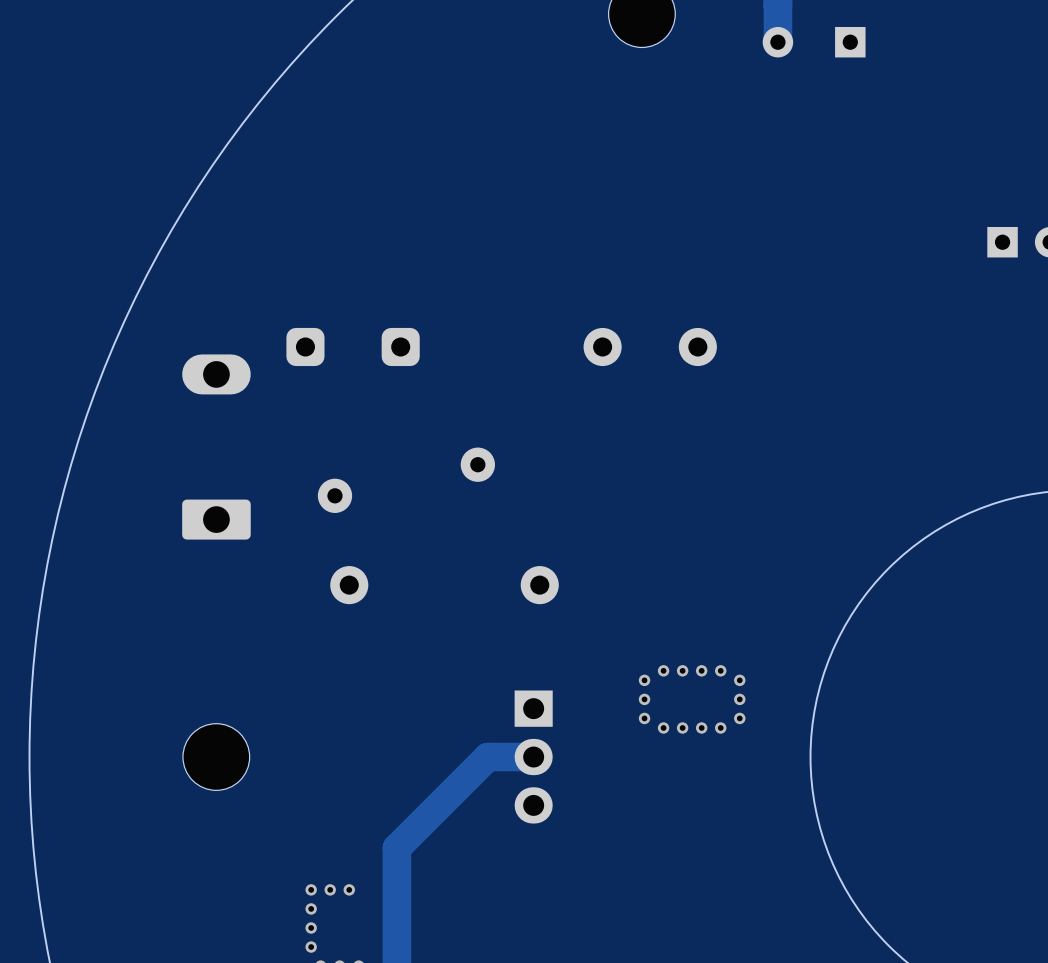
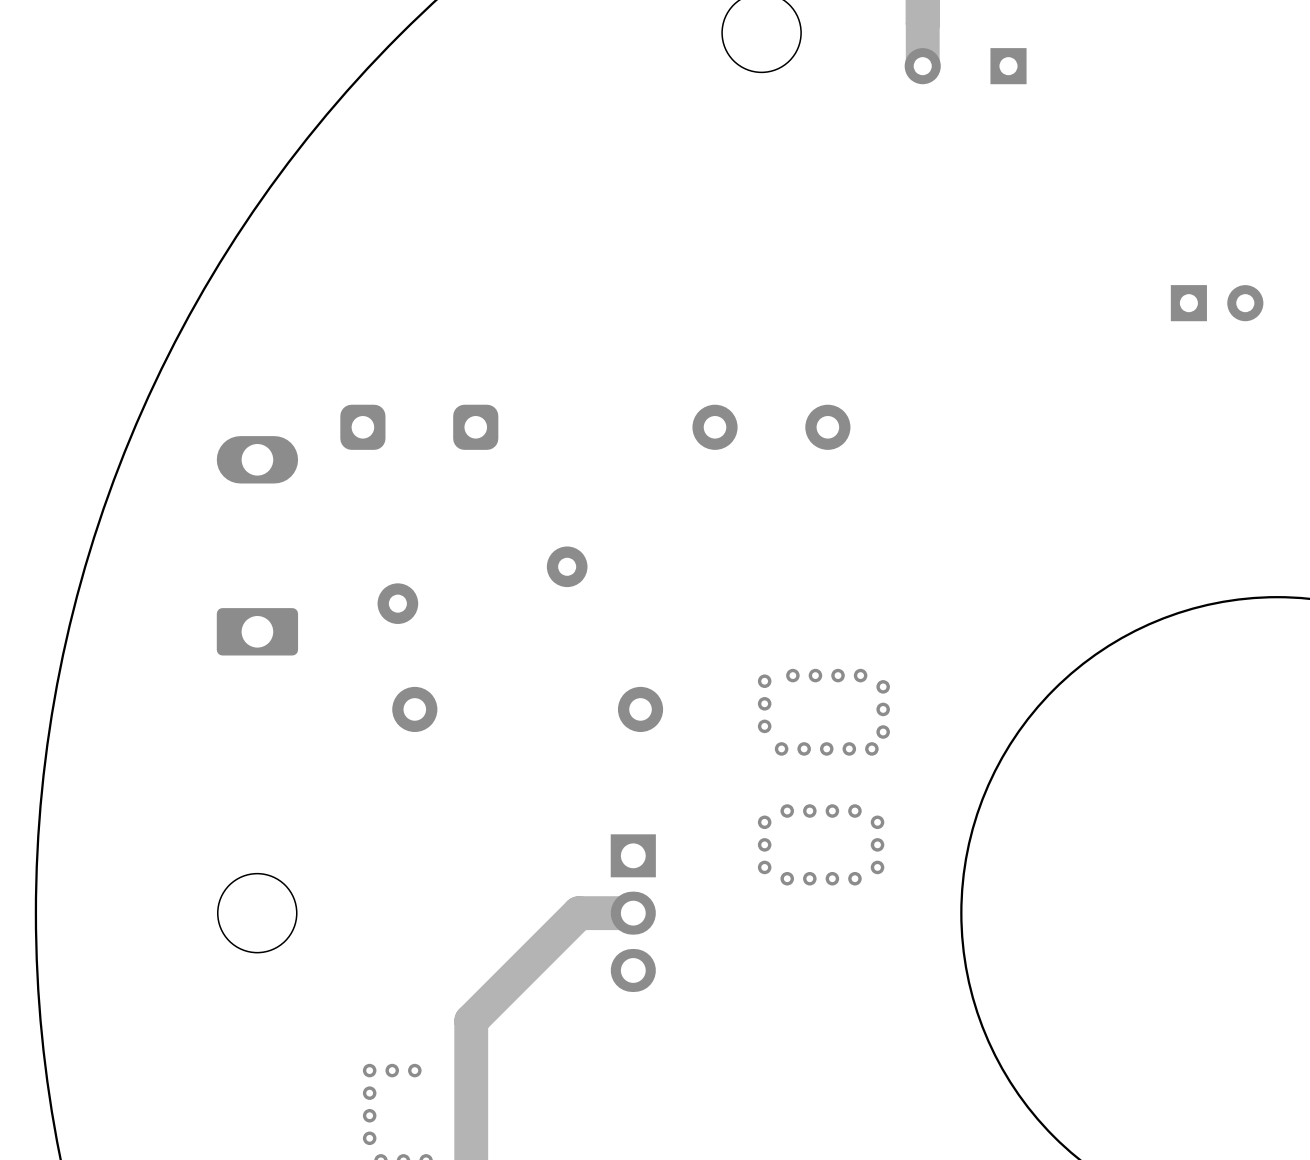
via: none -> (792, 675)
via: none -> (815, 675)
via: none -> (838, 675)
via: none -> (860, 675)
via: none -> (764, 681)
via: none -> (883, 686)
via: none -> (764, 703)
via: none -> (883, 709)
via: none -> (764, 726)
via: none -> (883, 732)
via: none -> (781, 748)
via: none -> (804, 748)
via: none -> (826, 748)
via: none -> (849, 748)
via: none -> (871, 748)

